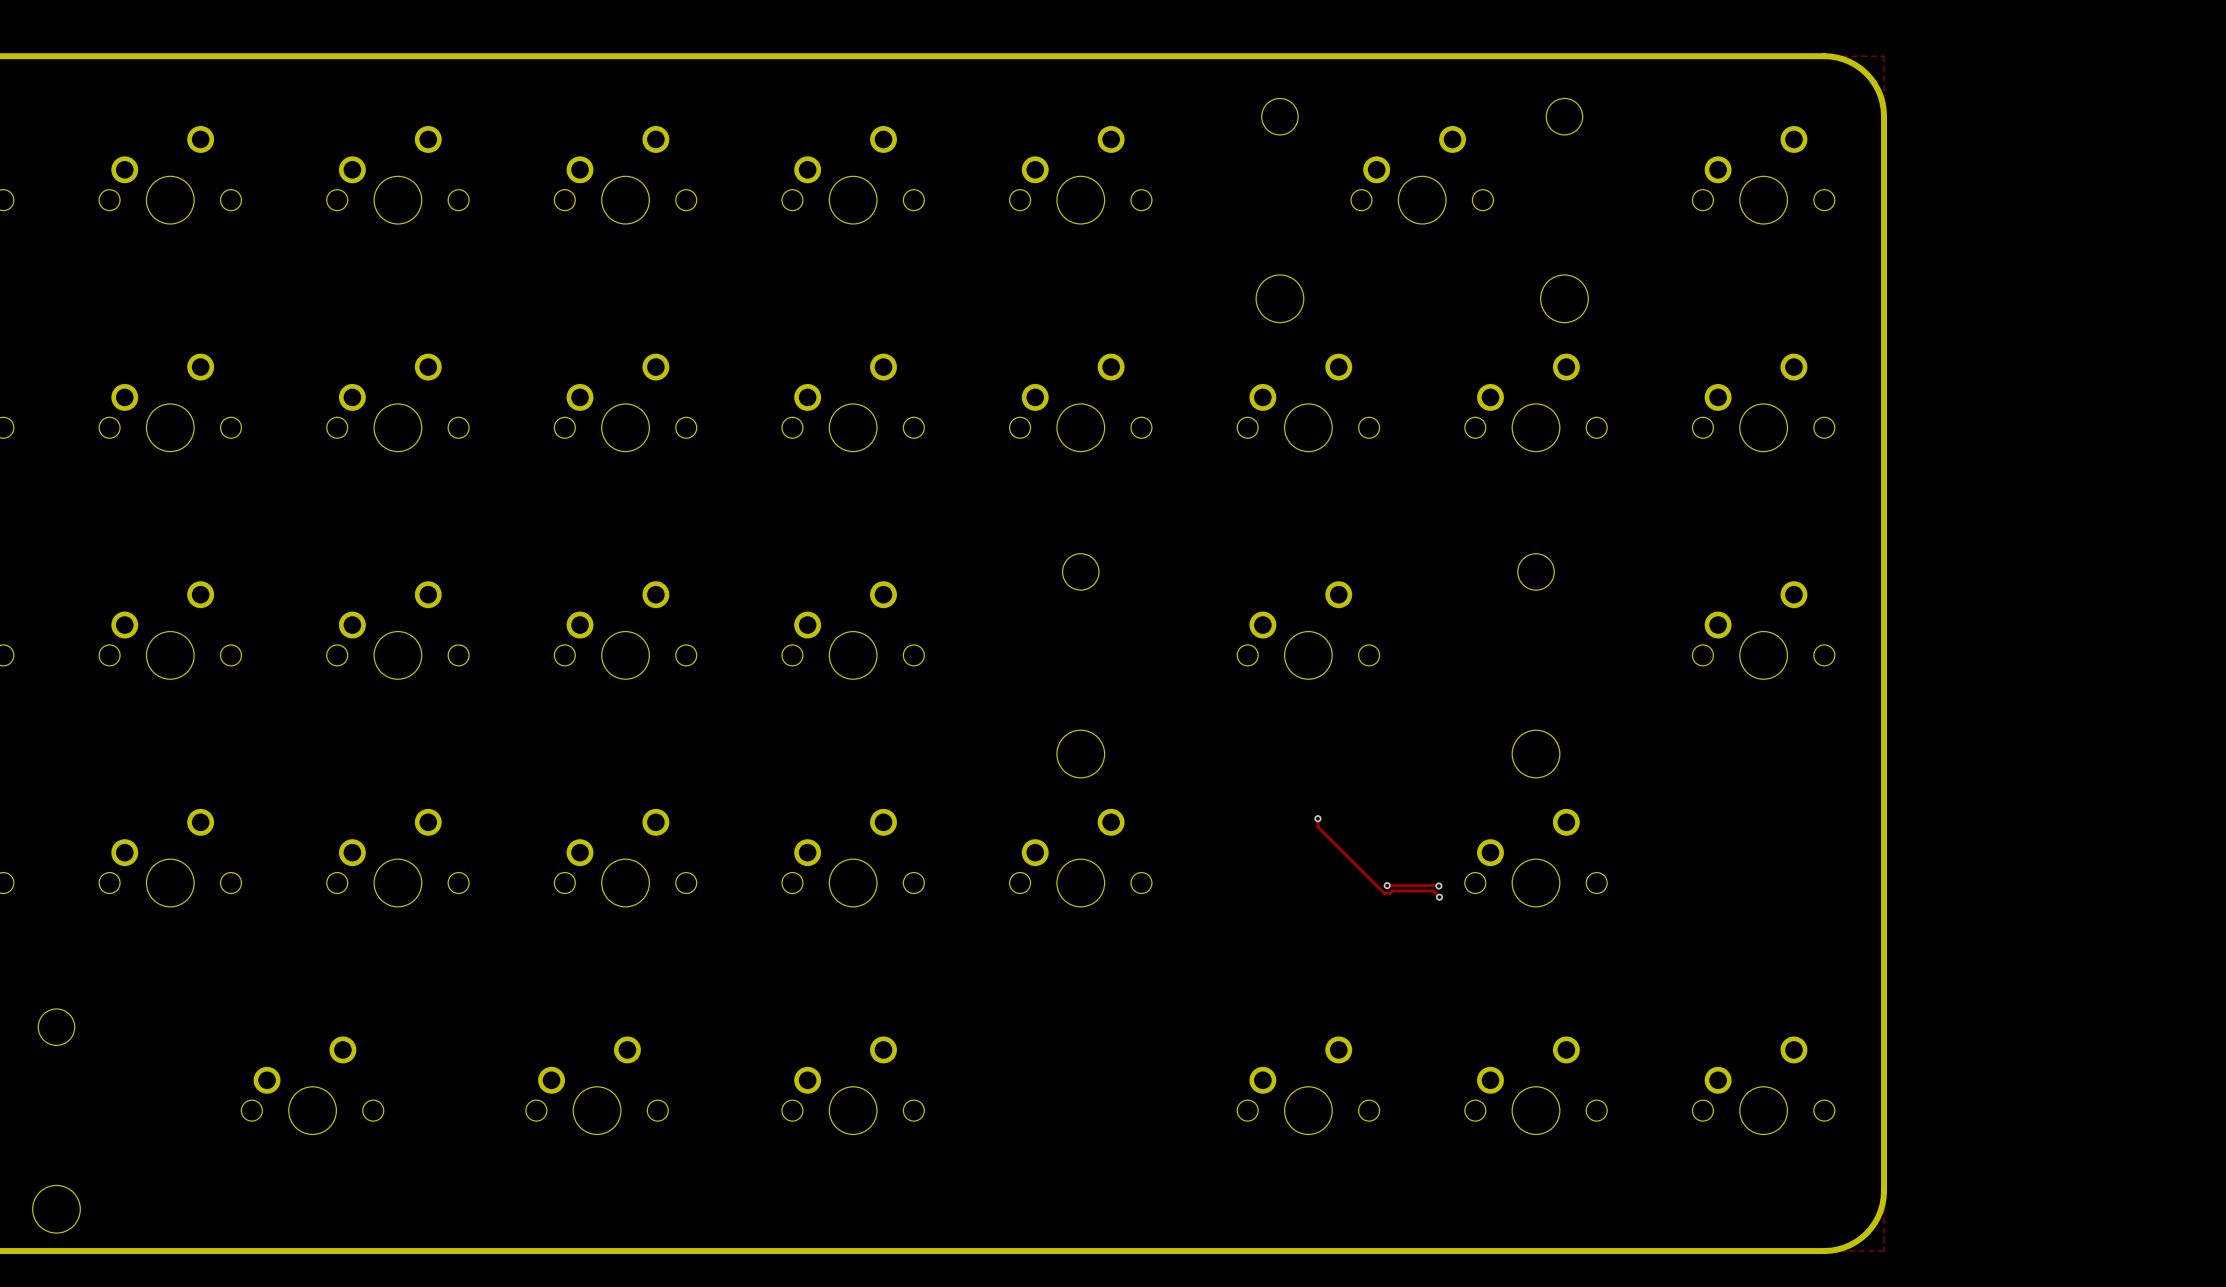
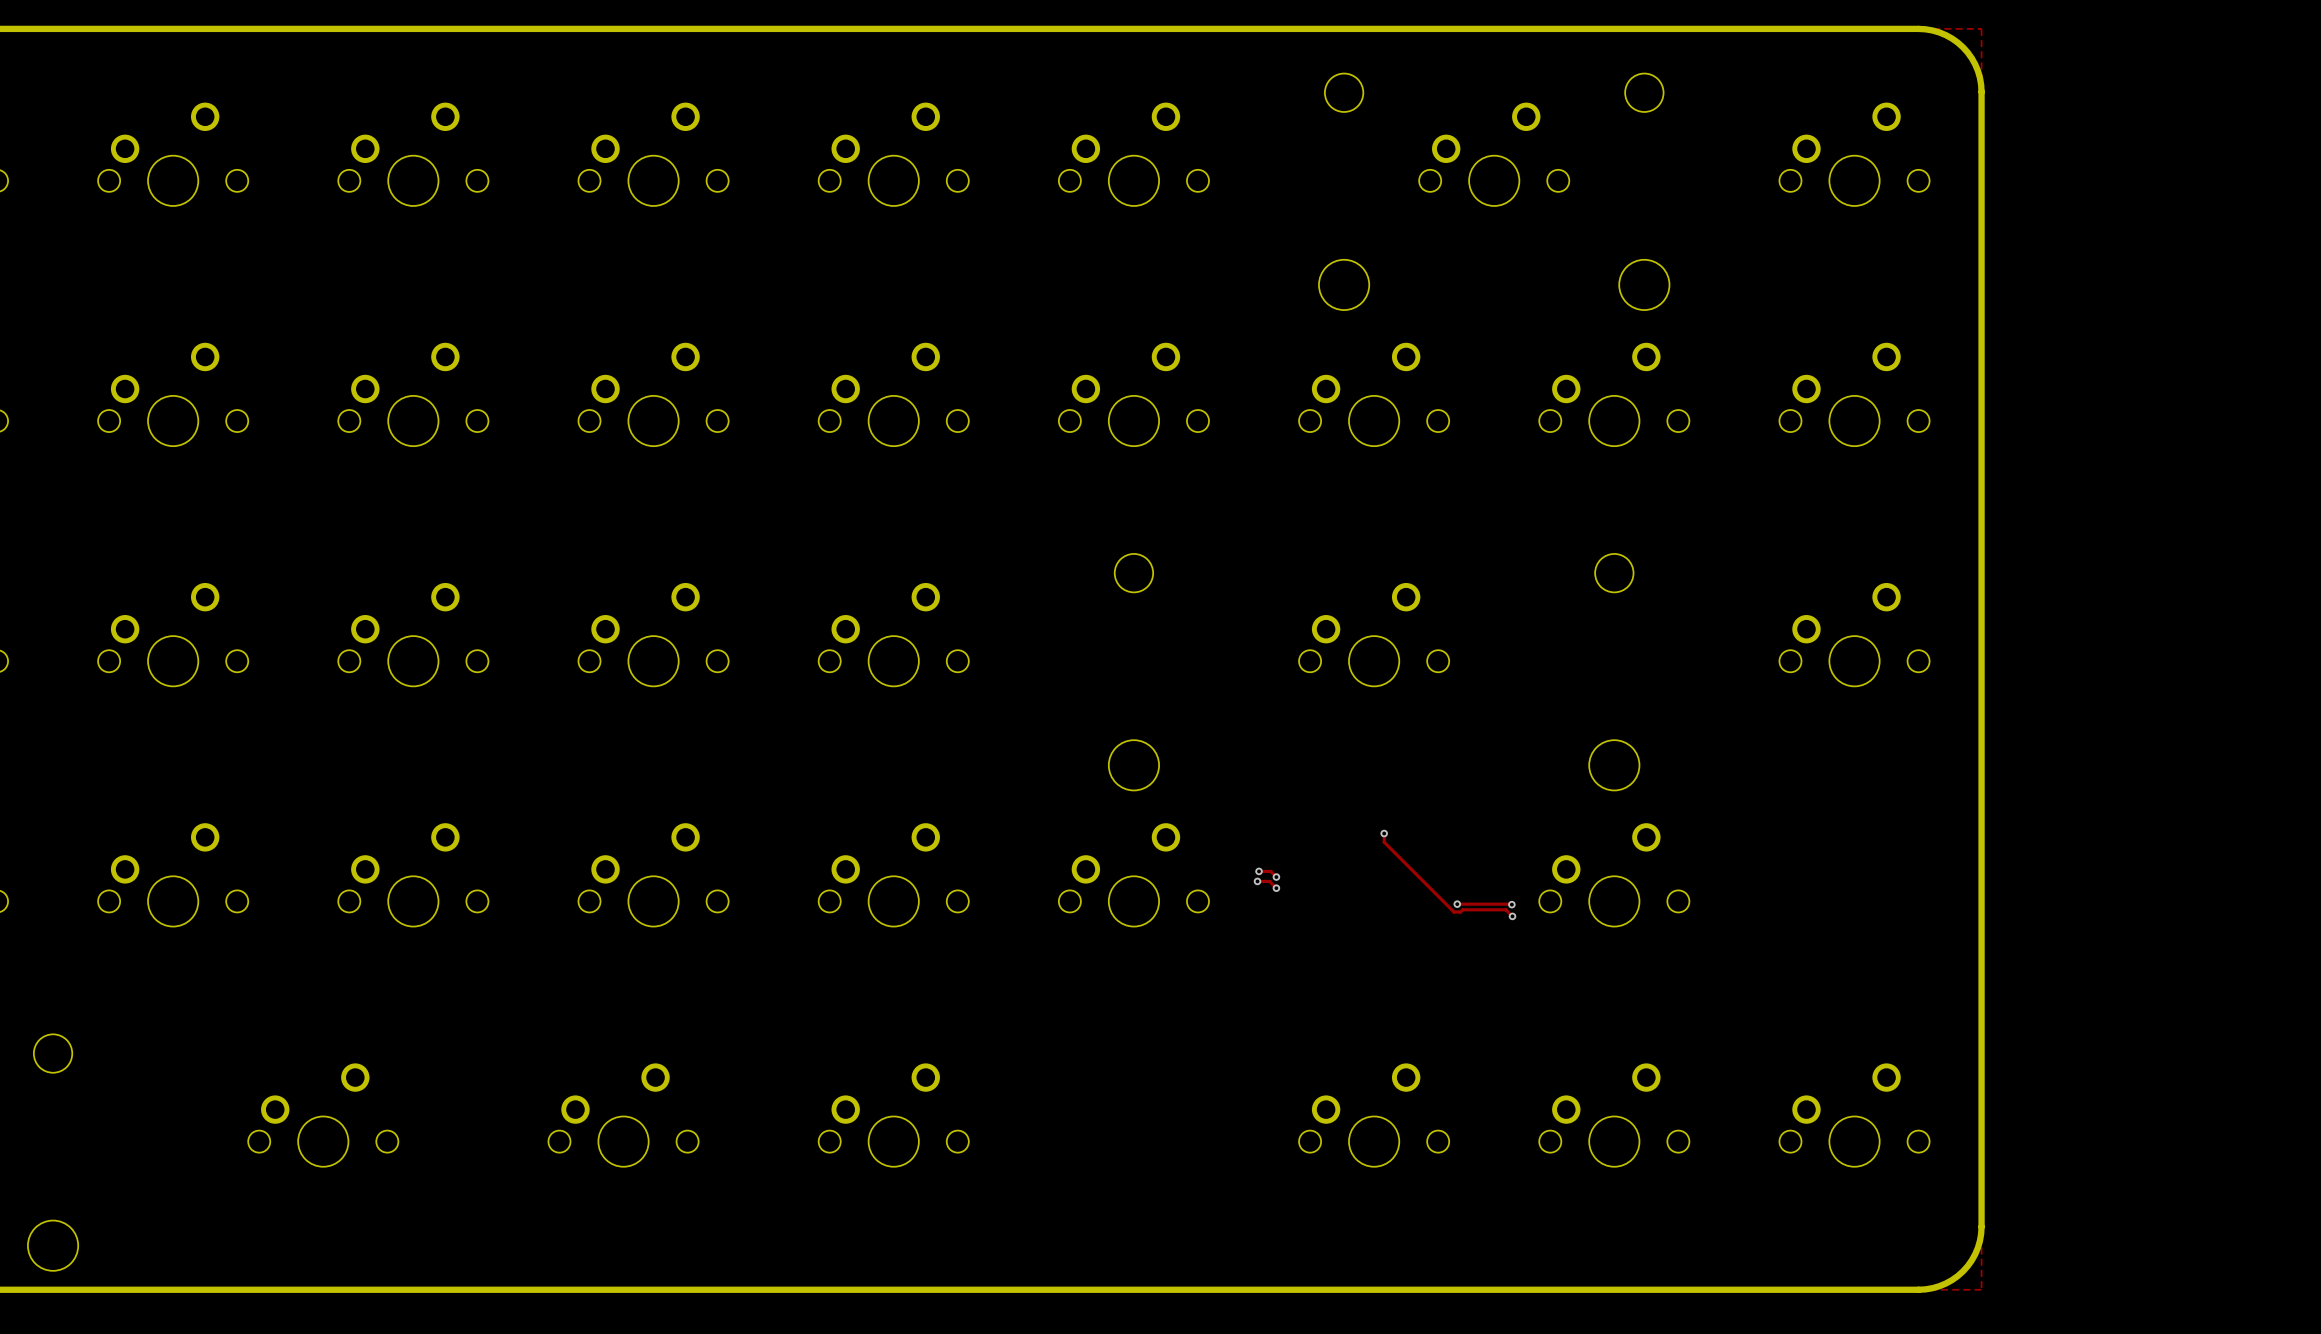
track: none -> (1259, 871) (1270, 871) (1276, 877)
via: none -> (1259, 871)
via: none -> (1276, 877)
track: none -> (1257, 881) (1269, 881) (1276, 888)
via: none -> (1257, 881)
via: none -> (1276, 888)

